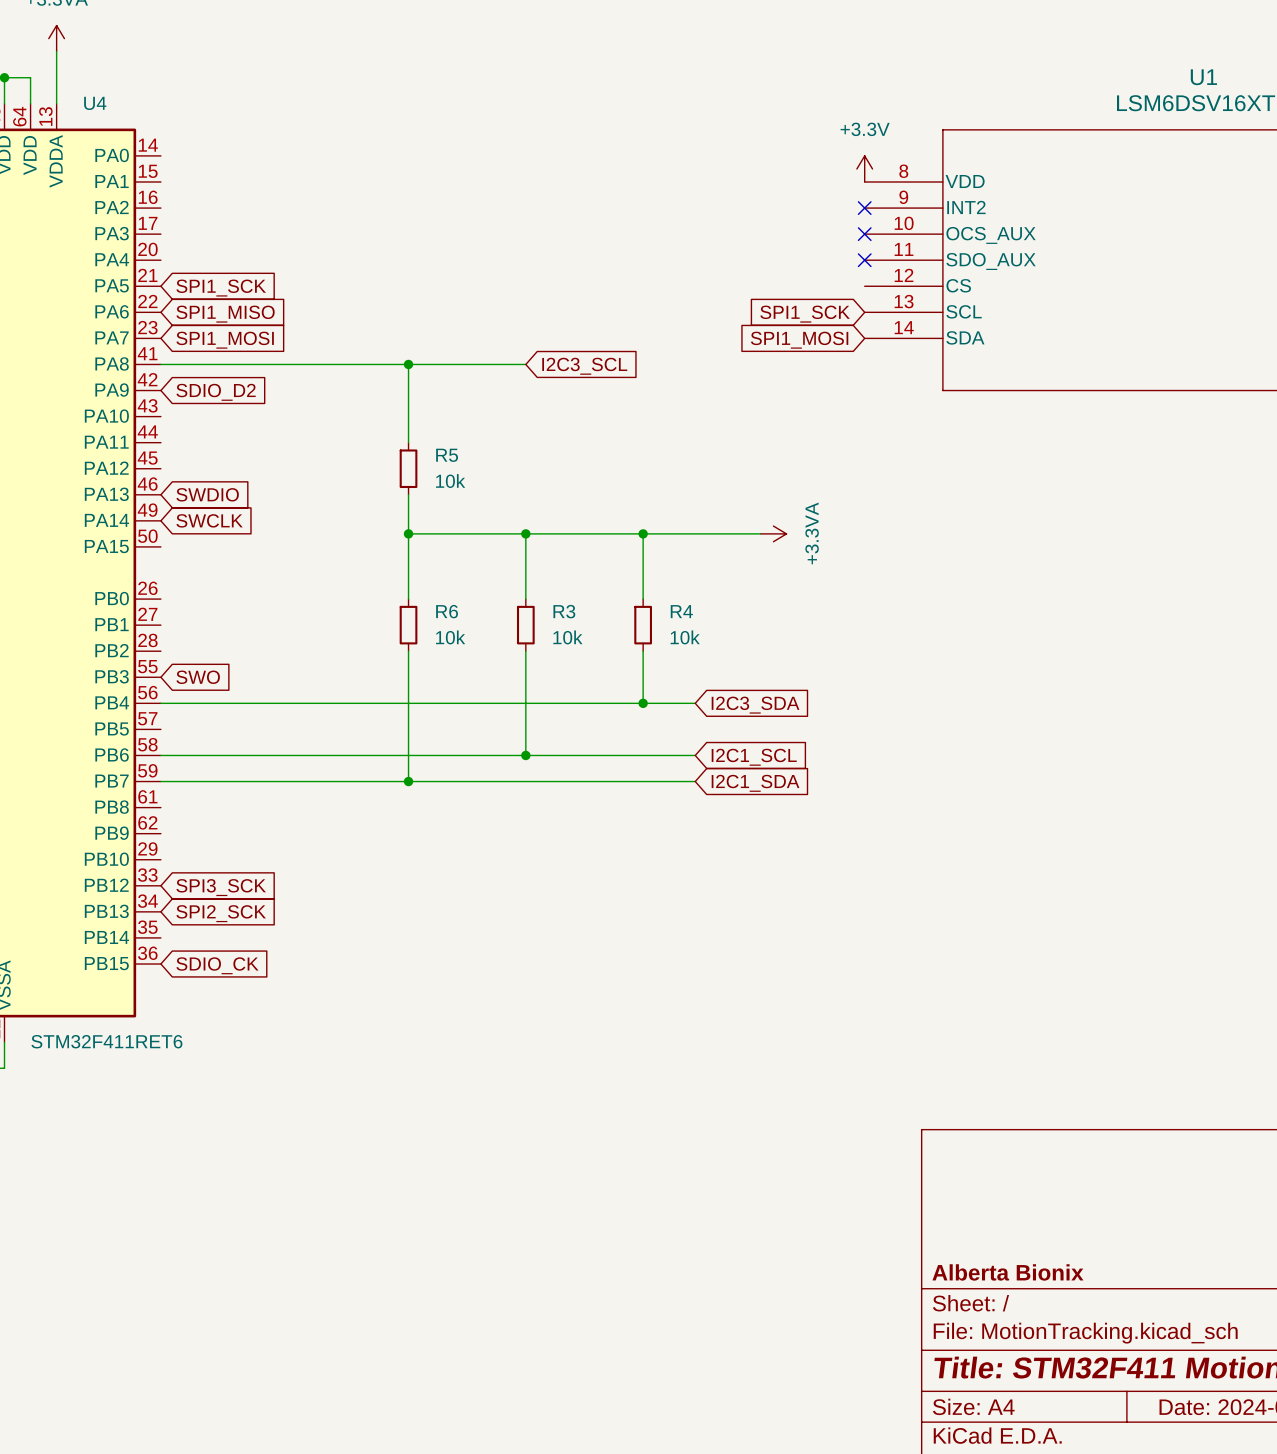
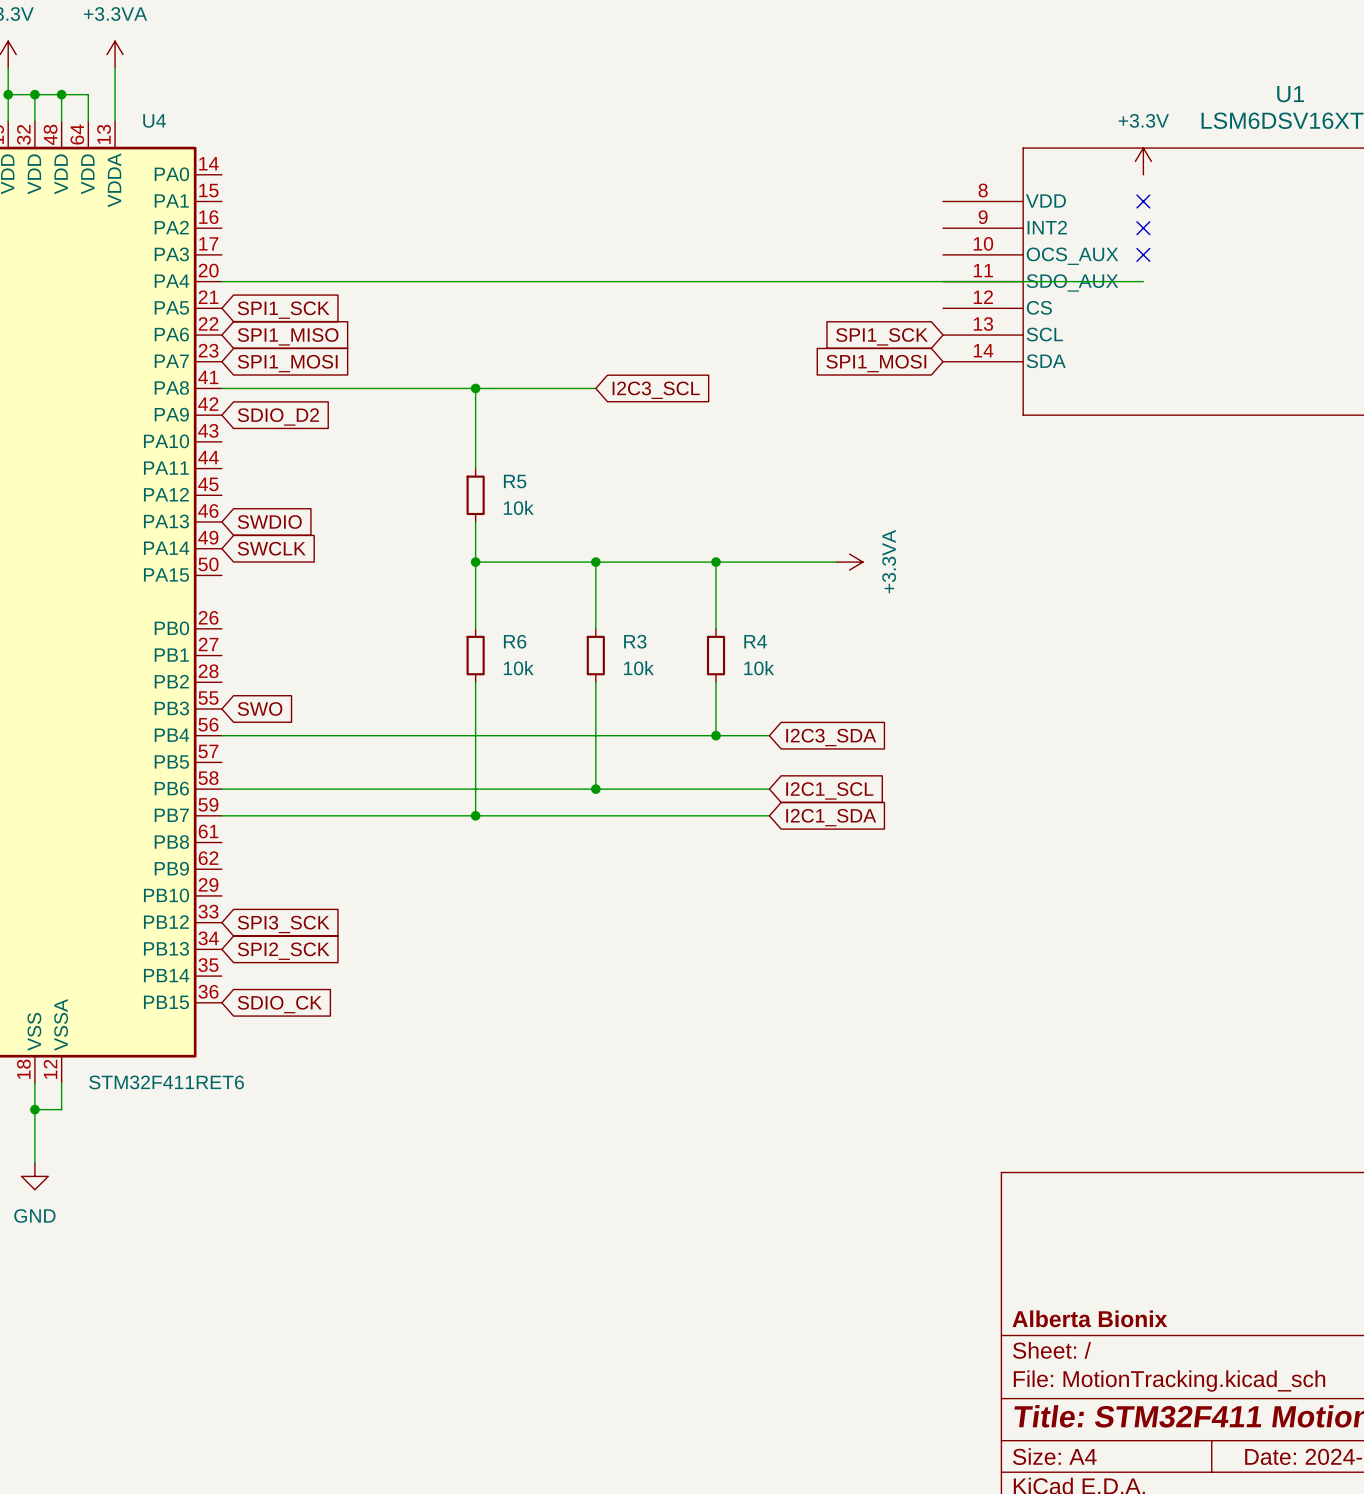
power symbol position: +3.3V (864, 168) -> +3.3V (1143, 161)
no-connect mark: none -> (1143, 201)
no-connect mark: (864, 208) -> none
no-connect mark: none -> (1143, 228)
no-connect mark: (864, 234) -> none
no-connect mark: none -> (1143, 254)
wire: none -> (221, 281) (1143, 281)
no-connect mark: (864, 260) -> none

